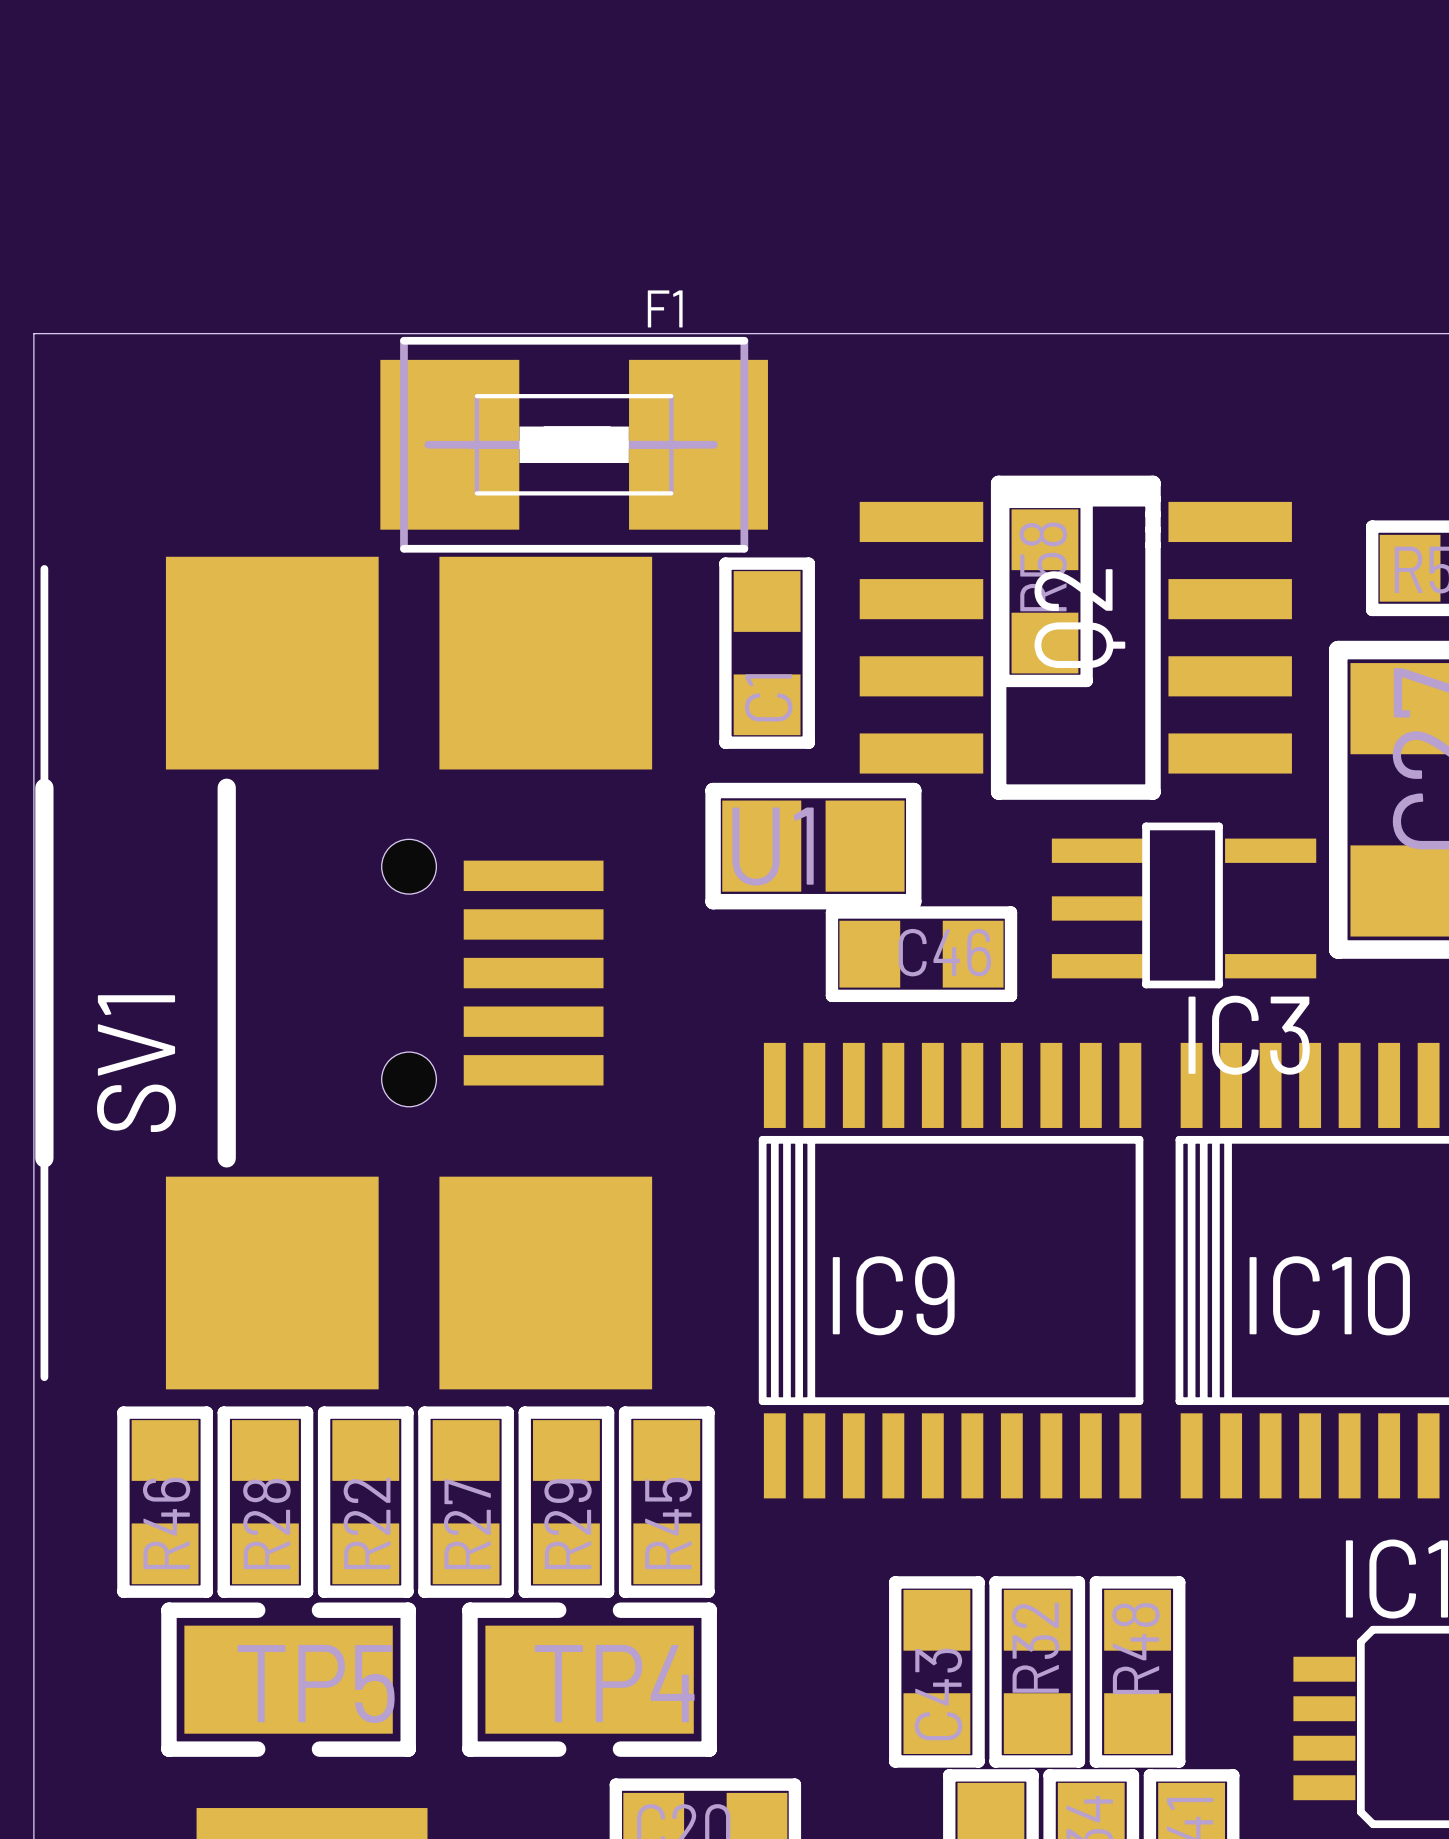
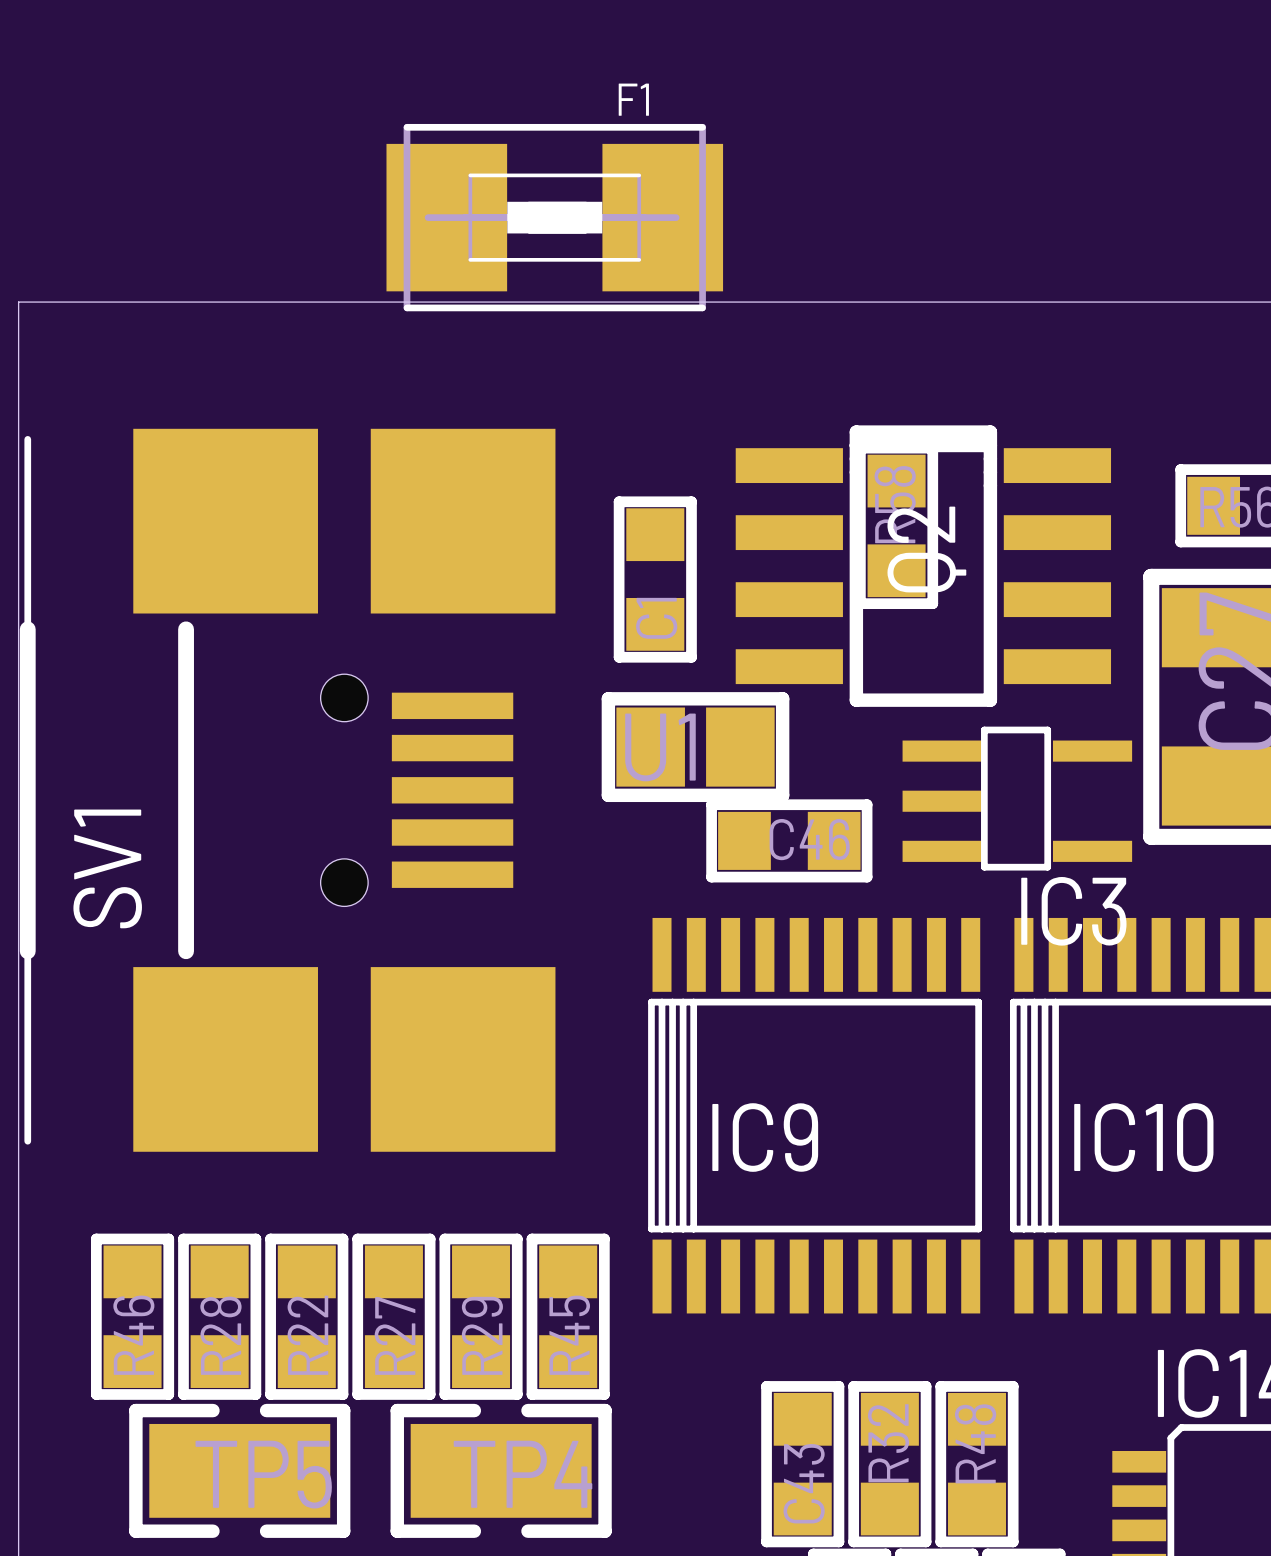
F1 position: (574, 444) -> (554, 217)
SV1 position: (343, 973) -> (287, 790)

